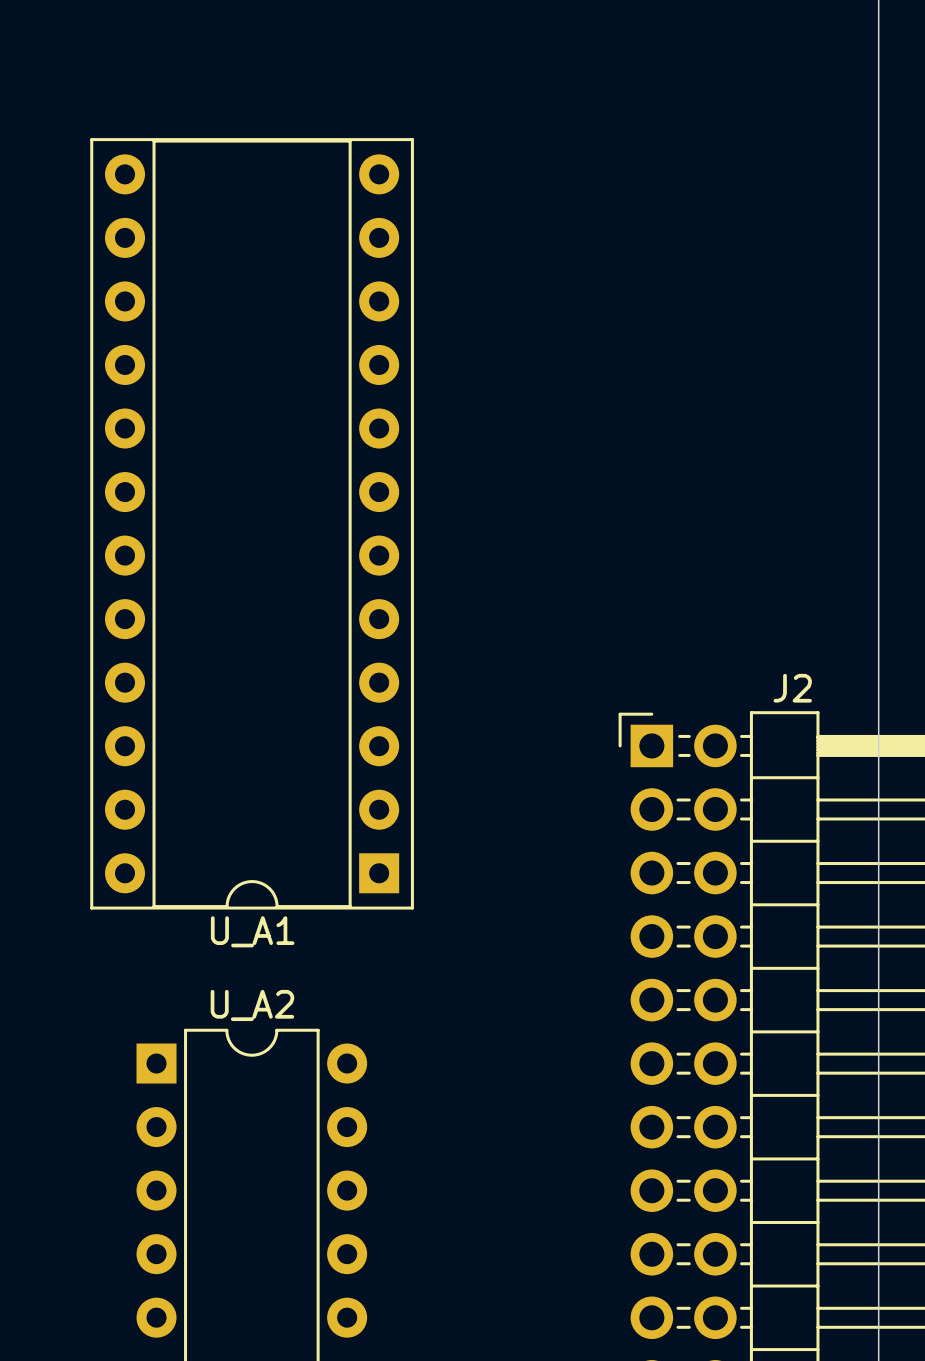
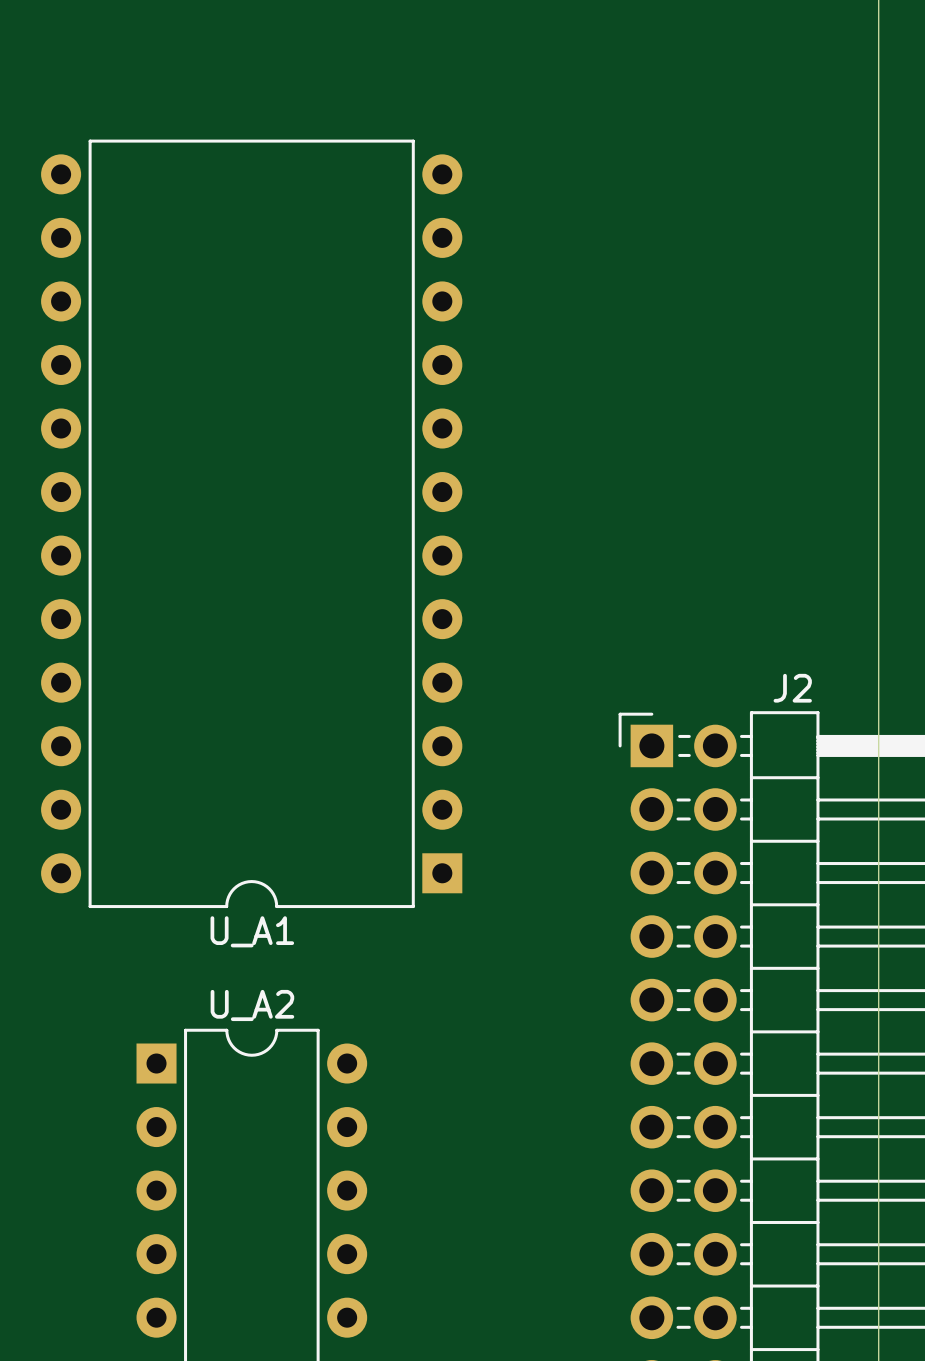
U_A1 footprint: [90, 138, 414, 910] -> [41, 139, 463, 909]

